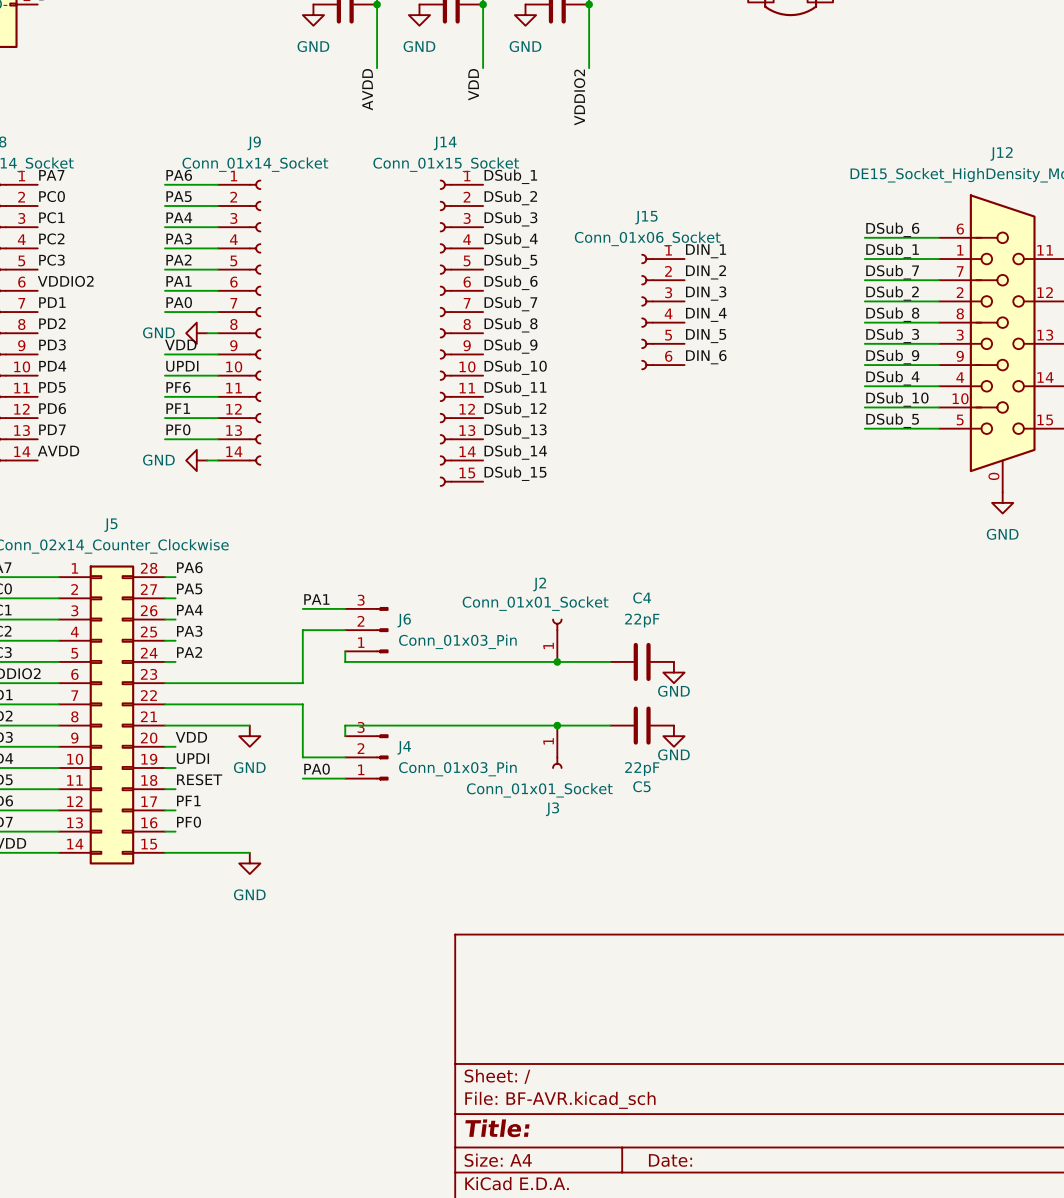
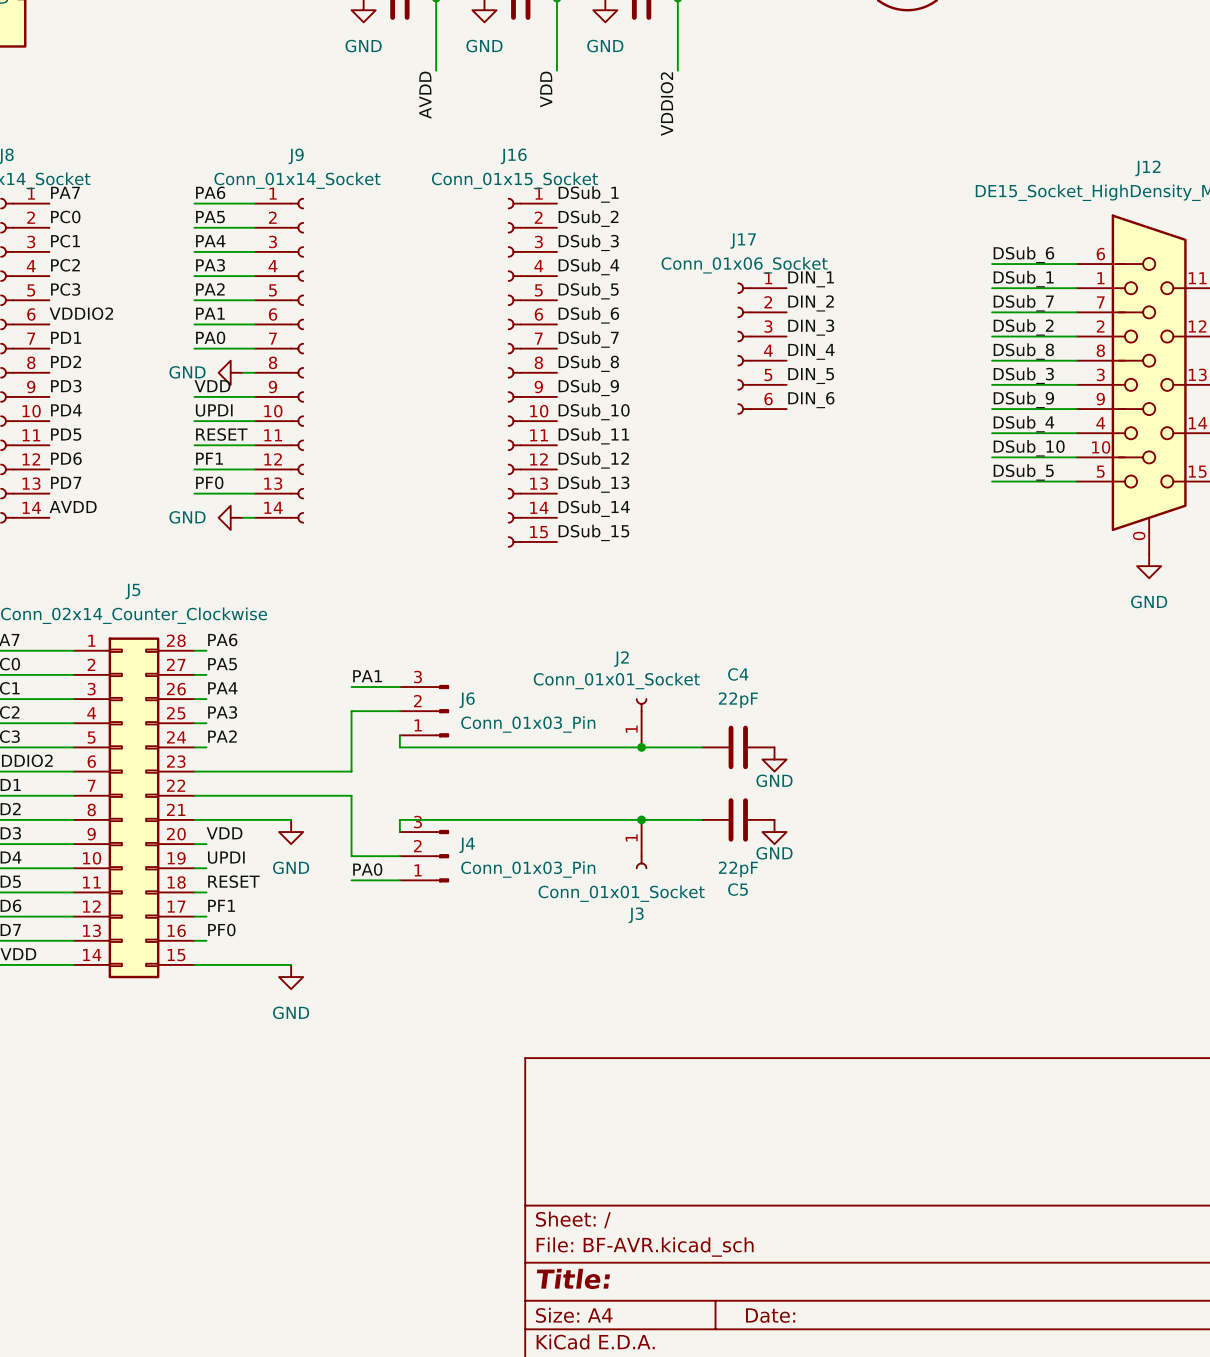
J14 name: J14 (445, 143) -> J16 (513, 156)
J15 name: J15 (646, 217) -> J17 (743, 241)
label: PF6 (178, 387) -> RESET (221, 434)

